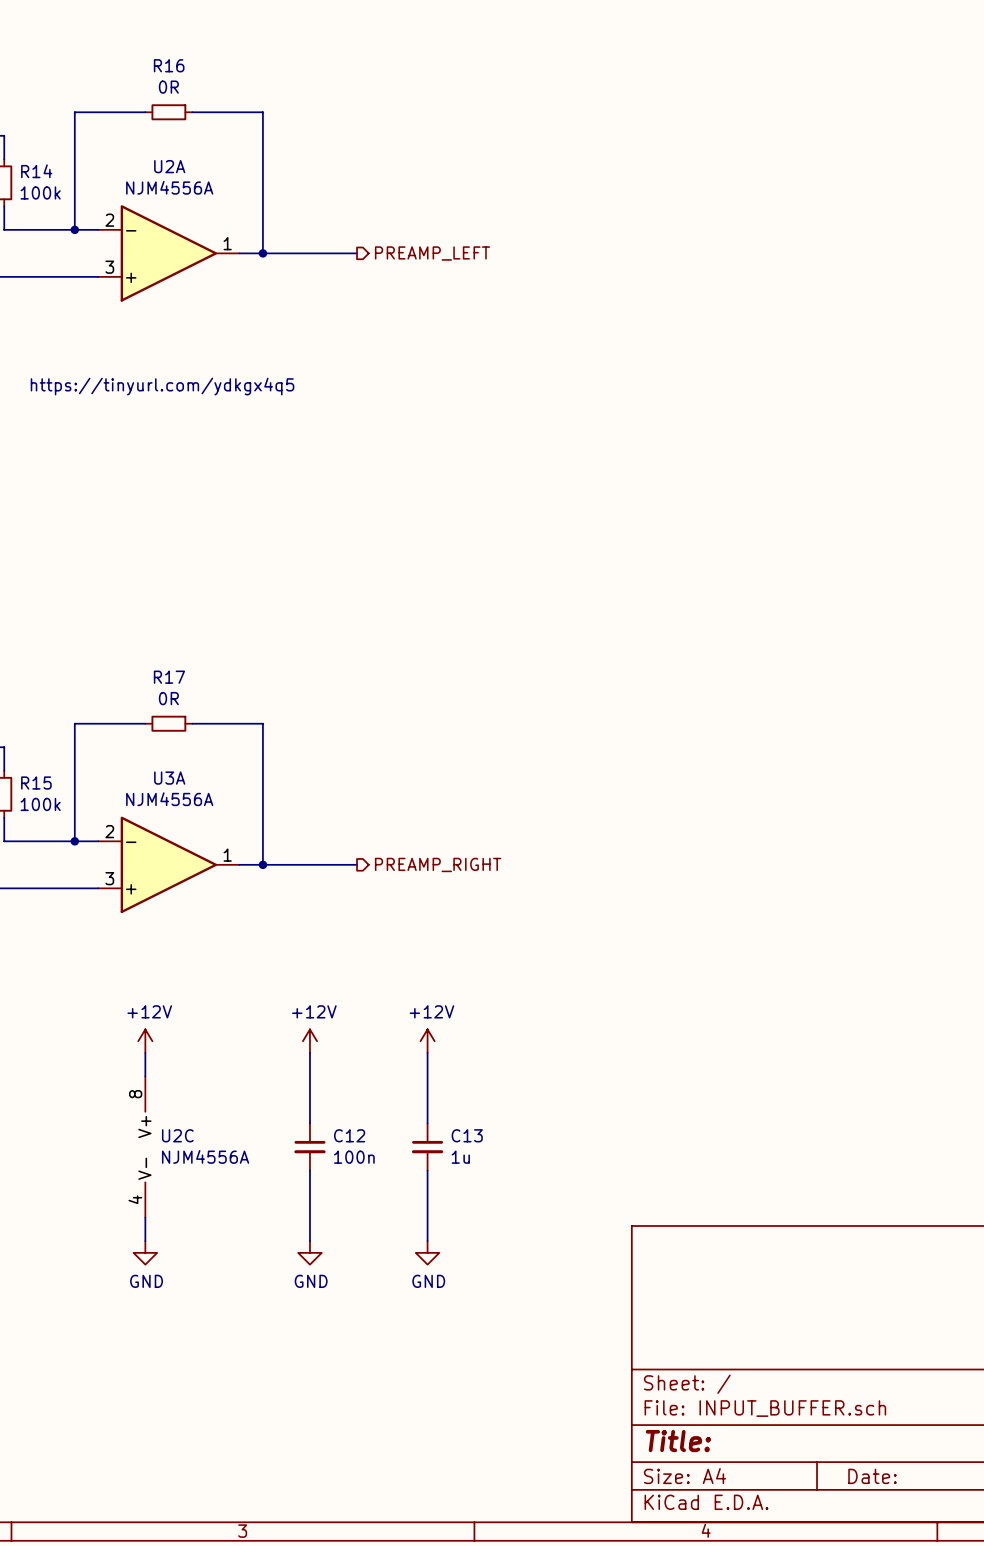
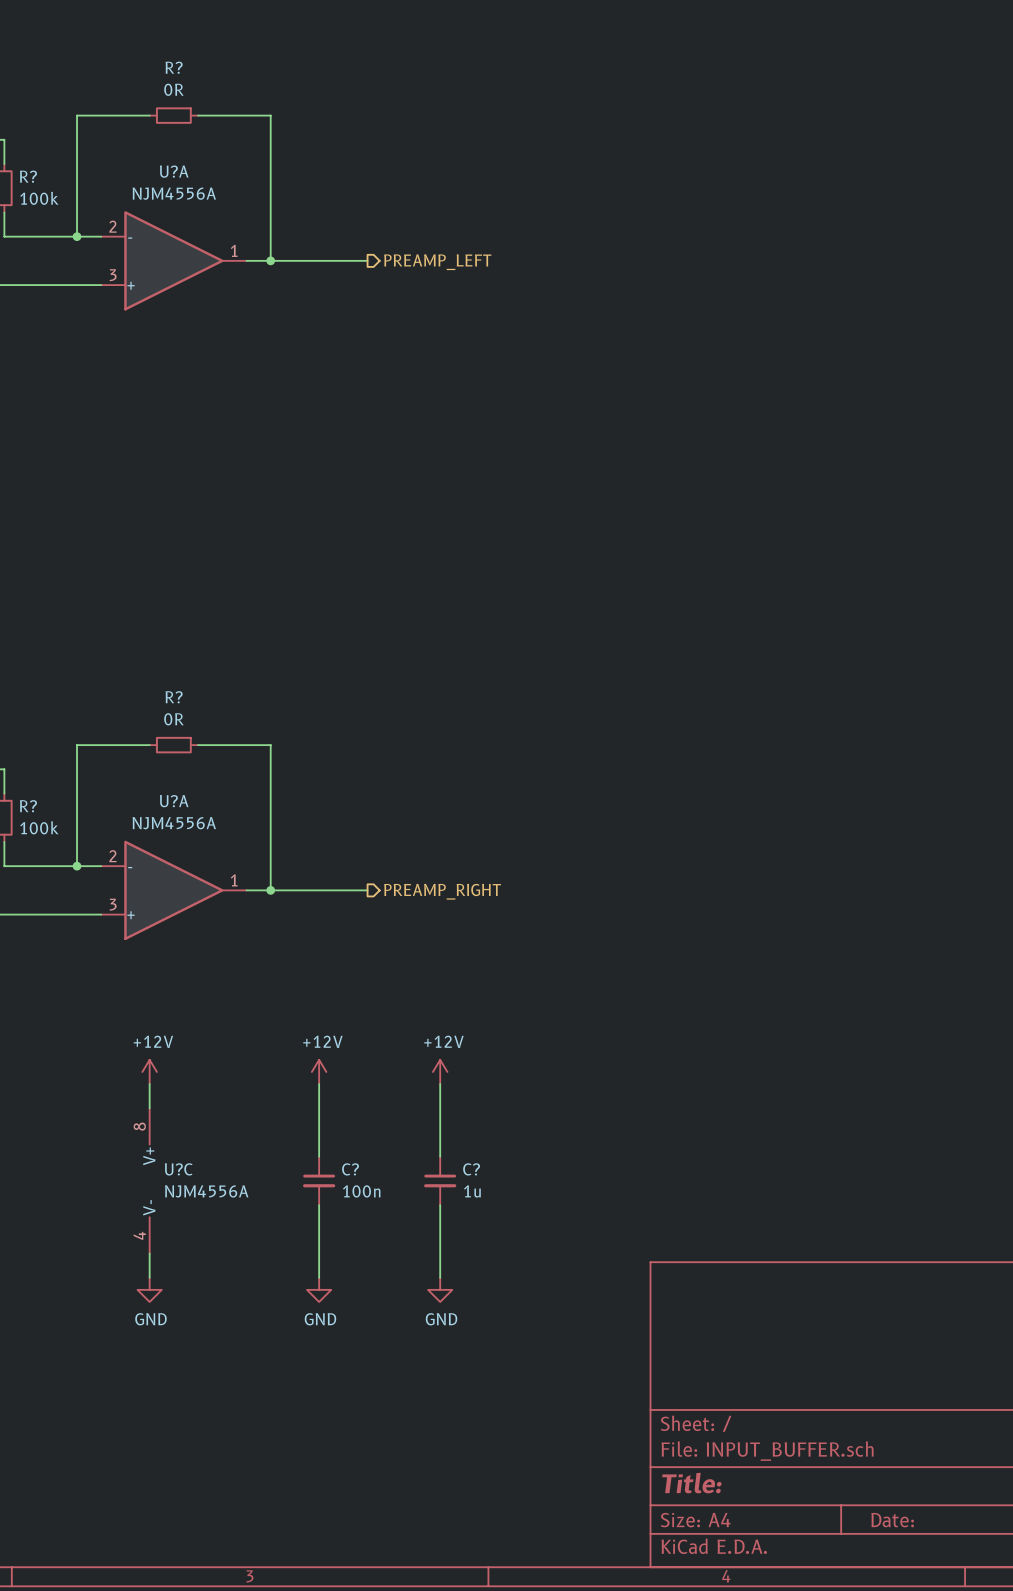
R16 name: R16 (169, 65) -> R? (174, 67)
U2A name: U2A (169, 166) -> U?A (174, 171)
R14 name: R14 (36, 171) -> R? (28, 176)
text: https://tinyurl.com/ydkgx4q5 (162, 386) -> none
R17 name: R17 (169, 677) -> R? (174, 697)
U3A name: U3A (169, 778) -> U?A (174, 801)
R15 name: R15 (36, 783) -> R? (28, 806)
U2C name: U2C (177, 1135) -> U?C (178, 1169)
C12 name: C12 (349, 1135) -> C? (350, 1169)
C13 name: C13 (467, 1135) -> C? (471, 1169)

